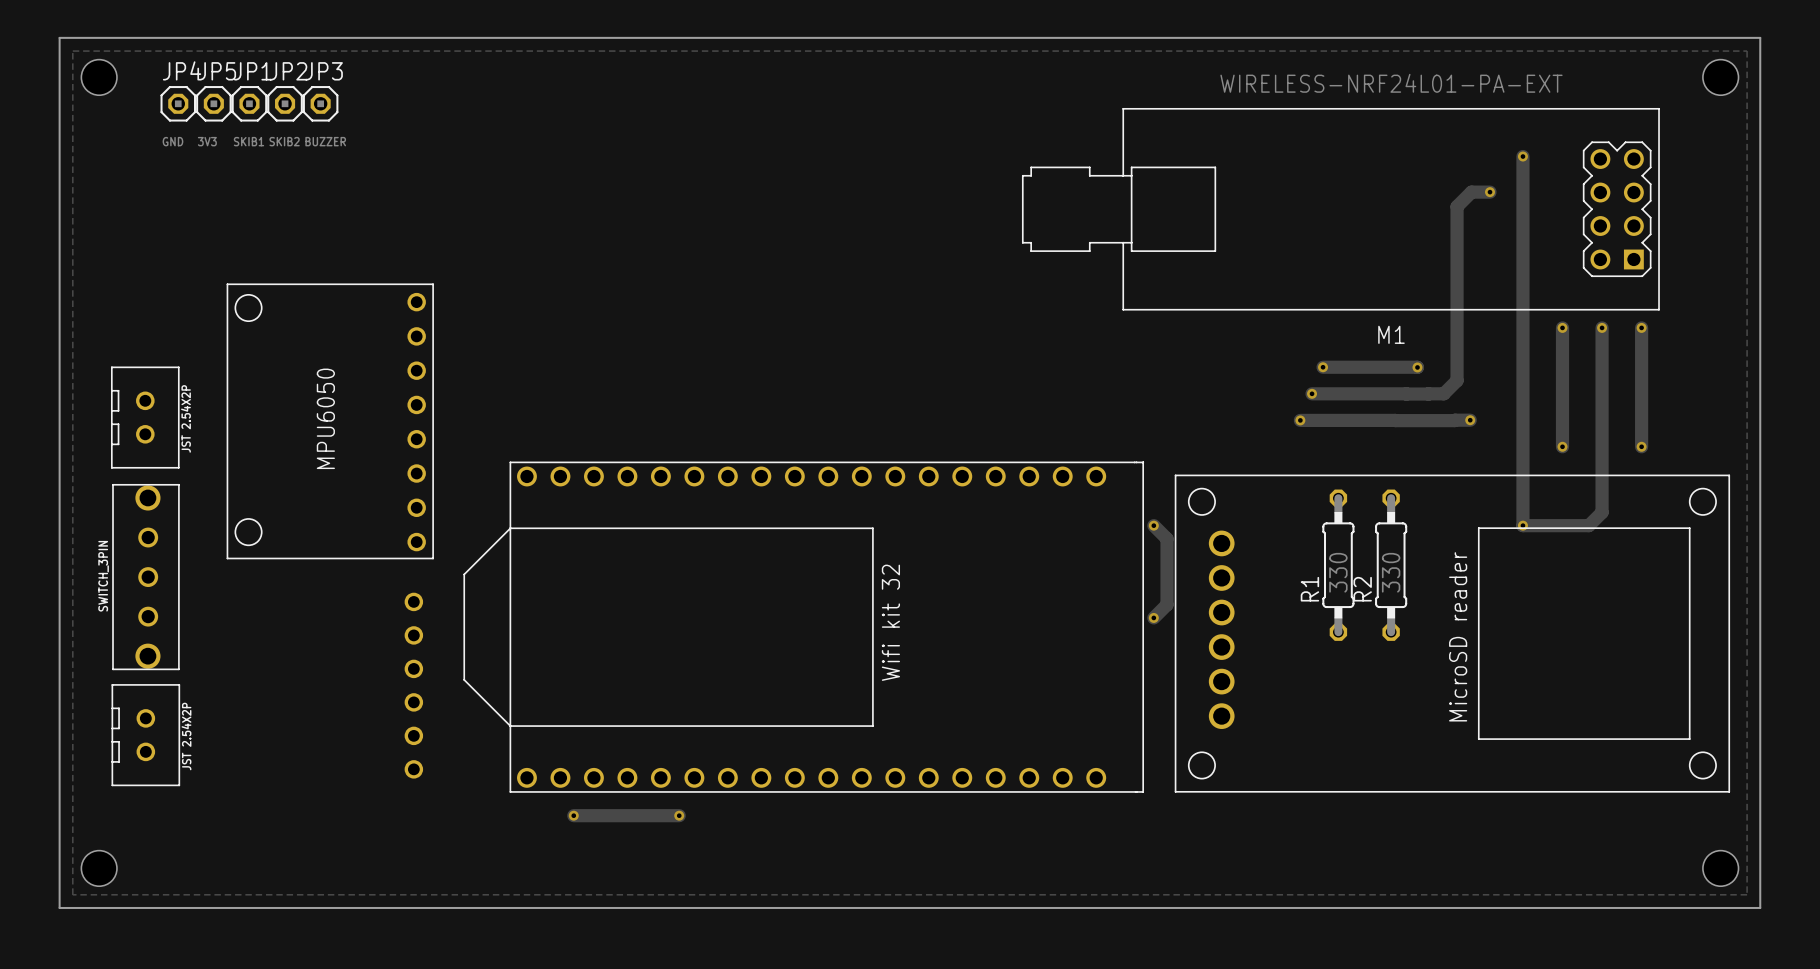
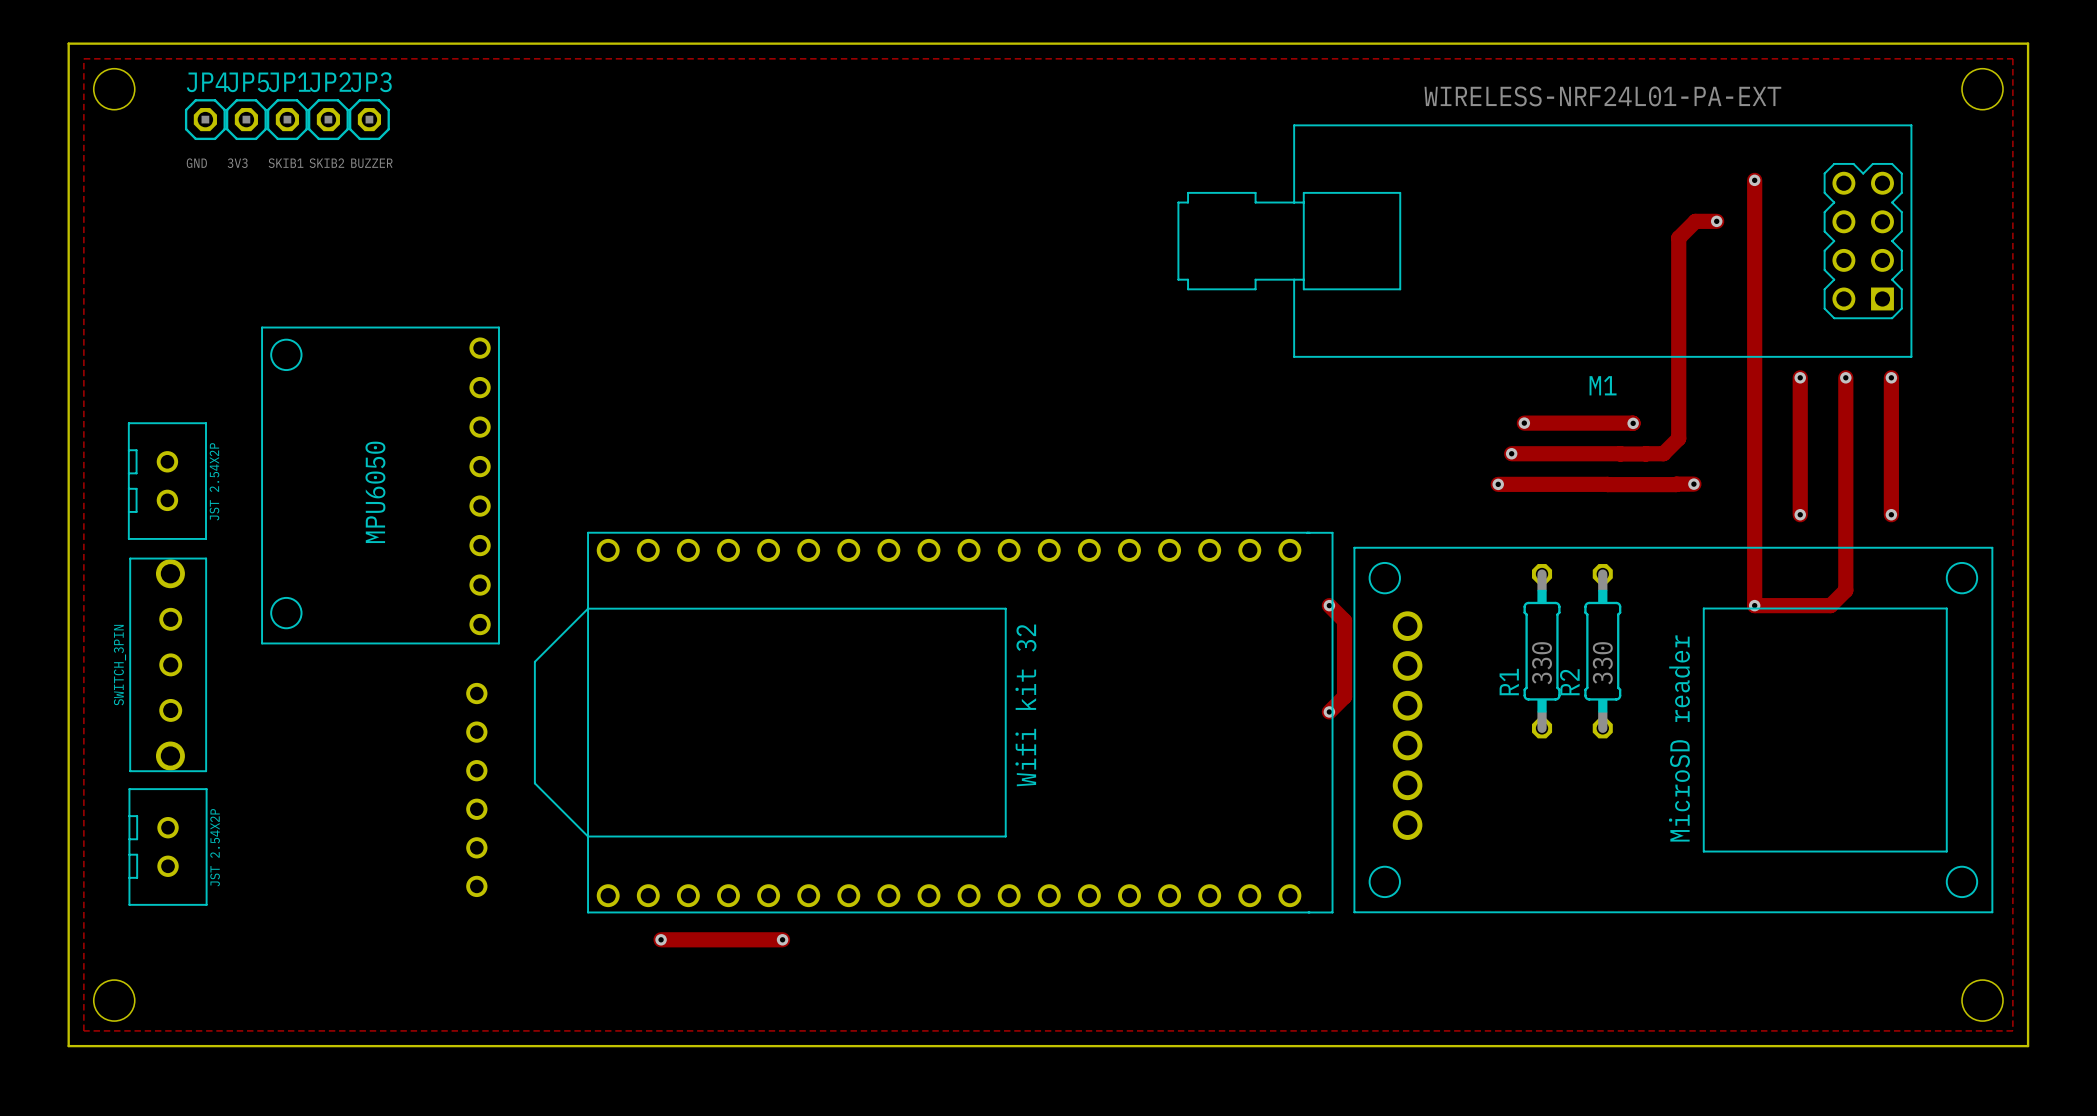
part footprint: [463, 461, 1145, 793] -> [533, 531, 1334, 914]

